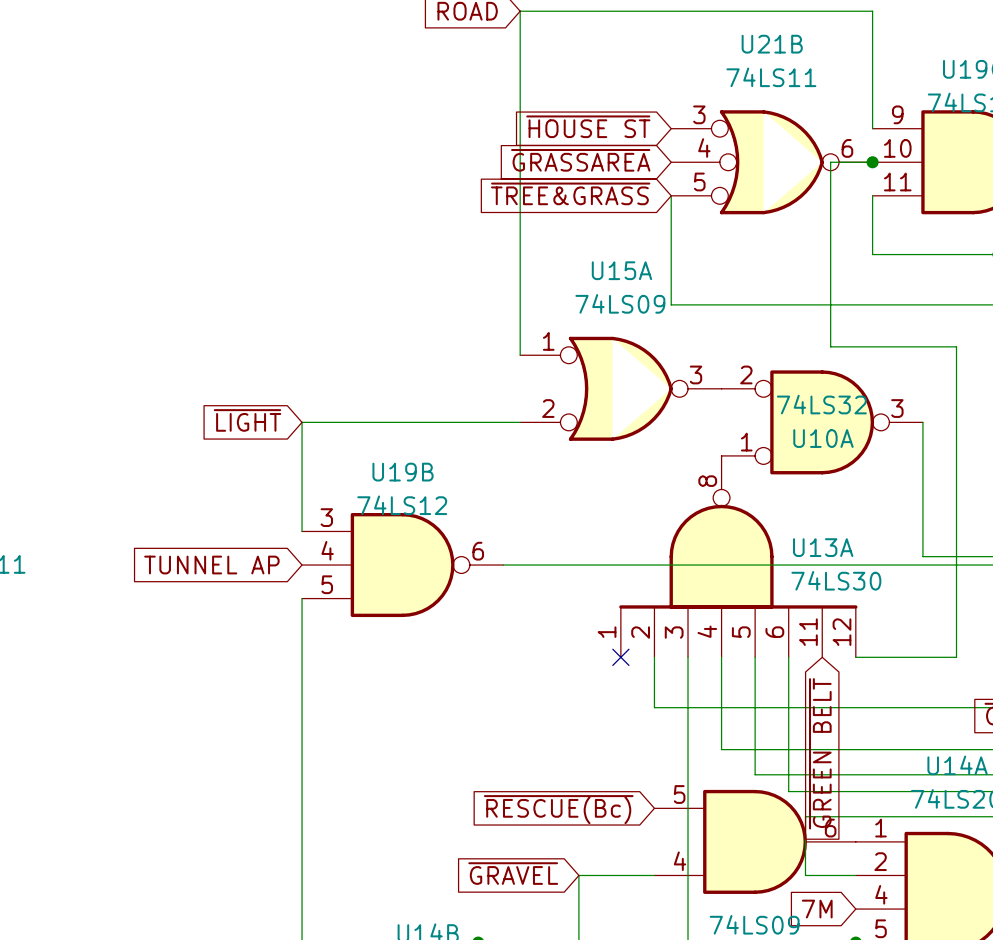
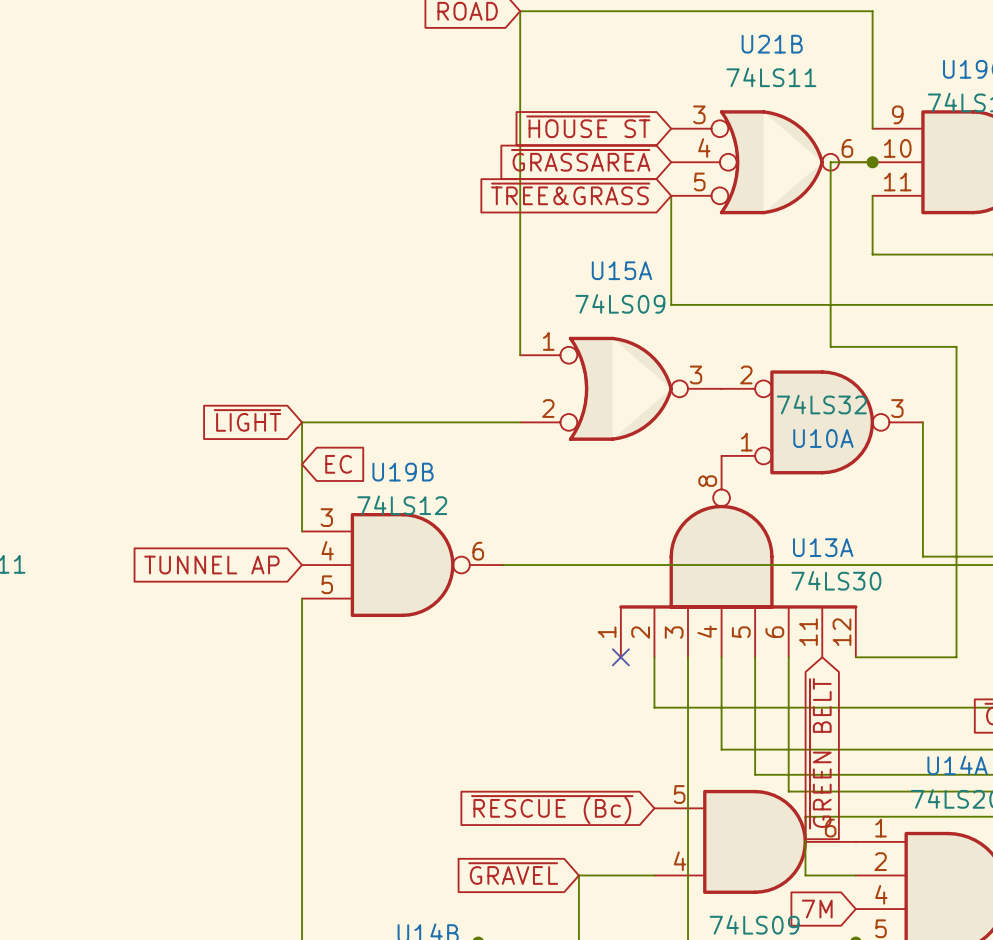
global label: none -> EC (338, 464)
global label: ~{RESCUE(Bc)} (558, 809) -> ~{RESCUE (Bc)} (552, 809)

